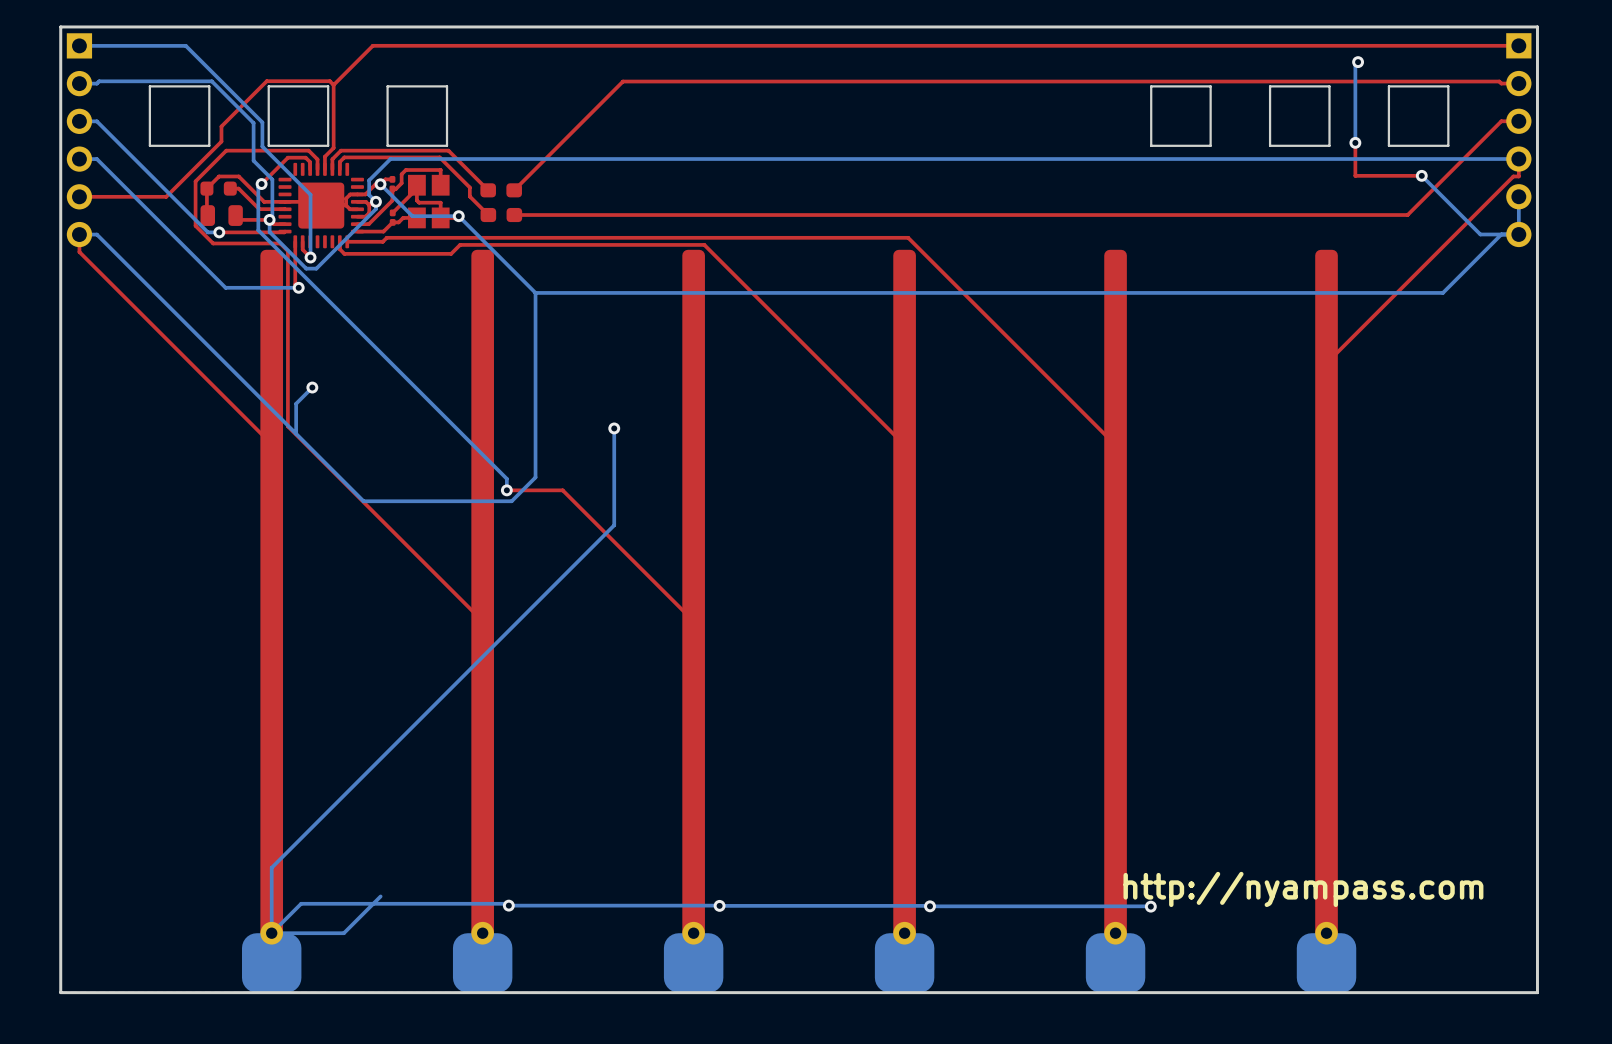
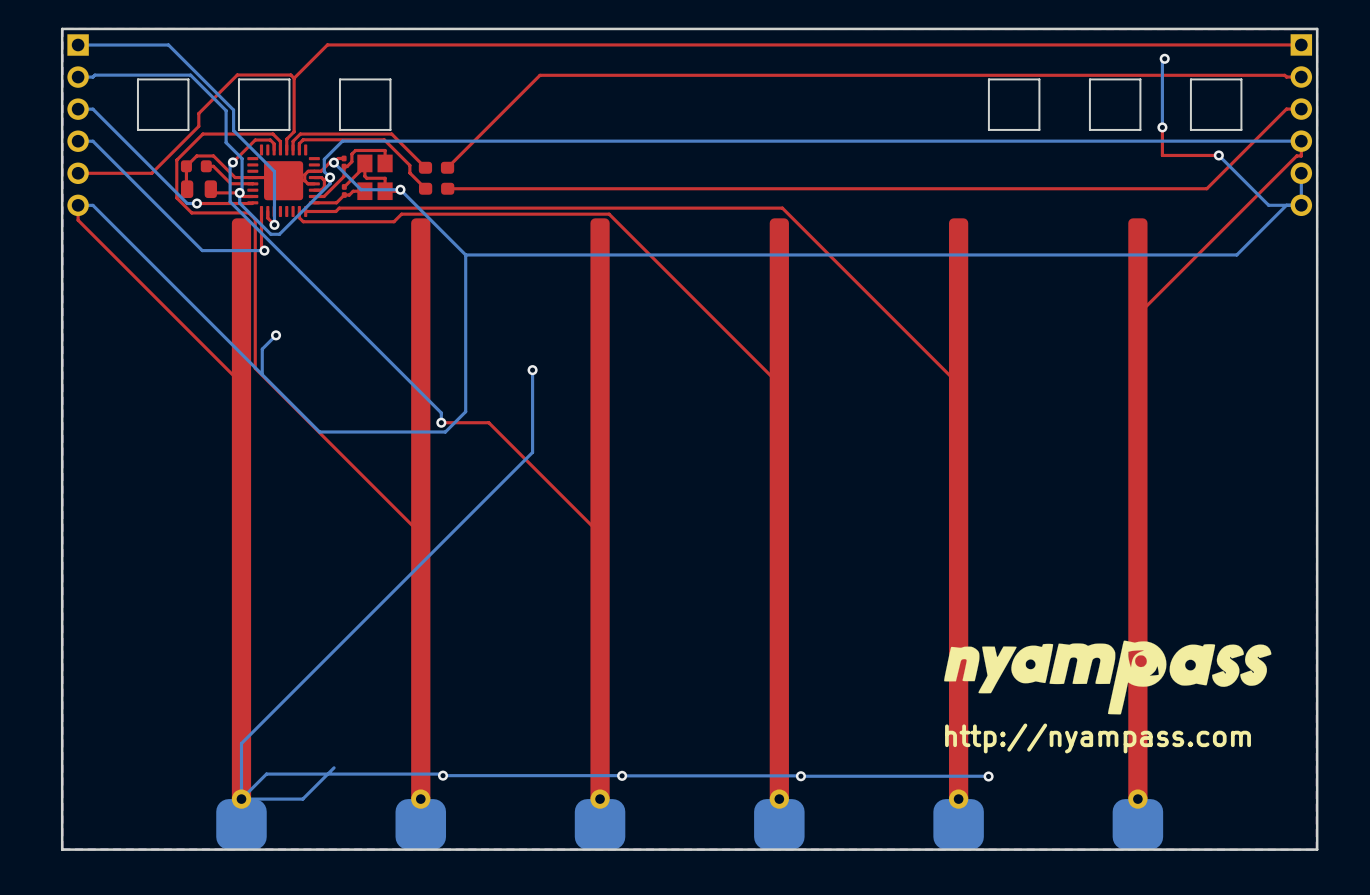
drawing: none -> [944, 640, 1272, 715]
text position: http://nyampass.com (1303, 889) -> http://nyampass.com (1098, 738)

